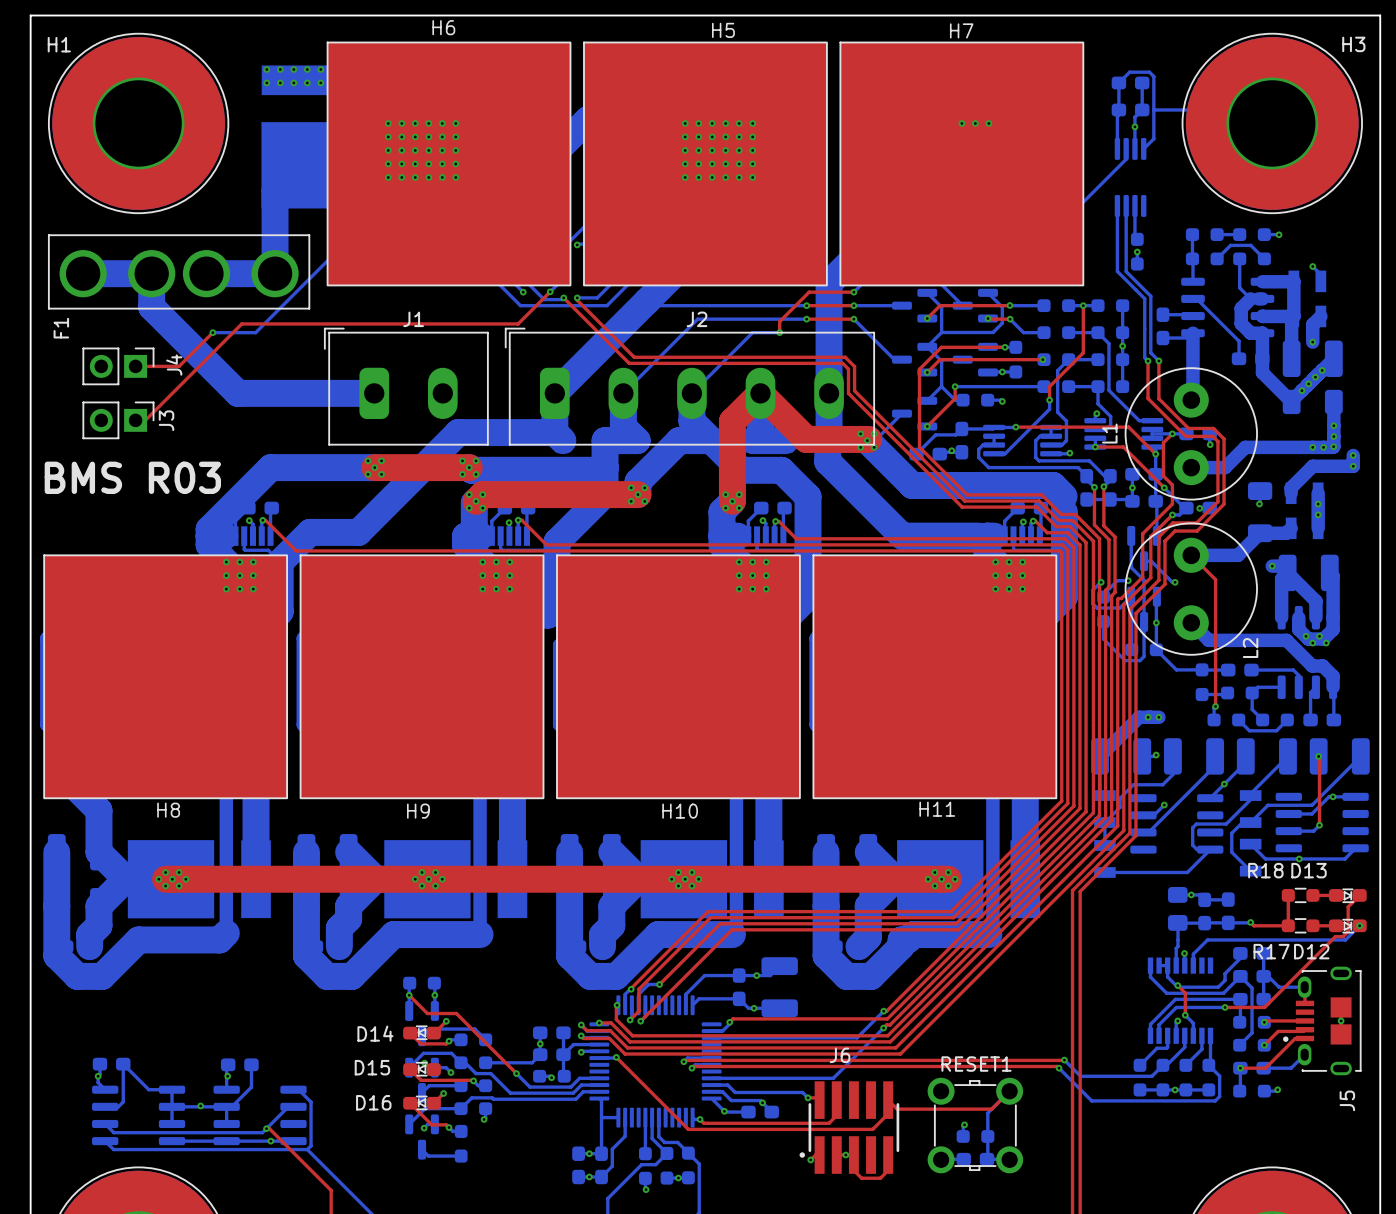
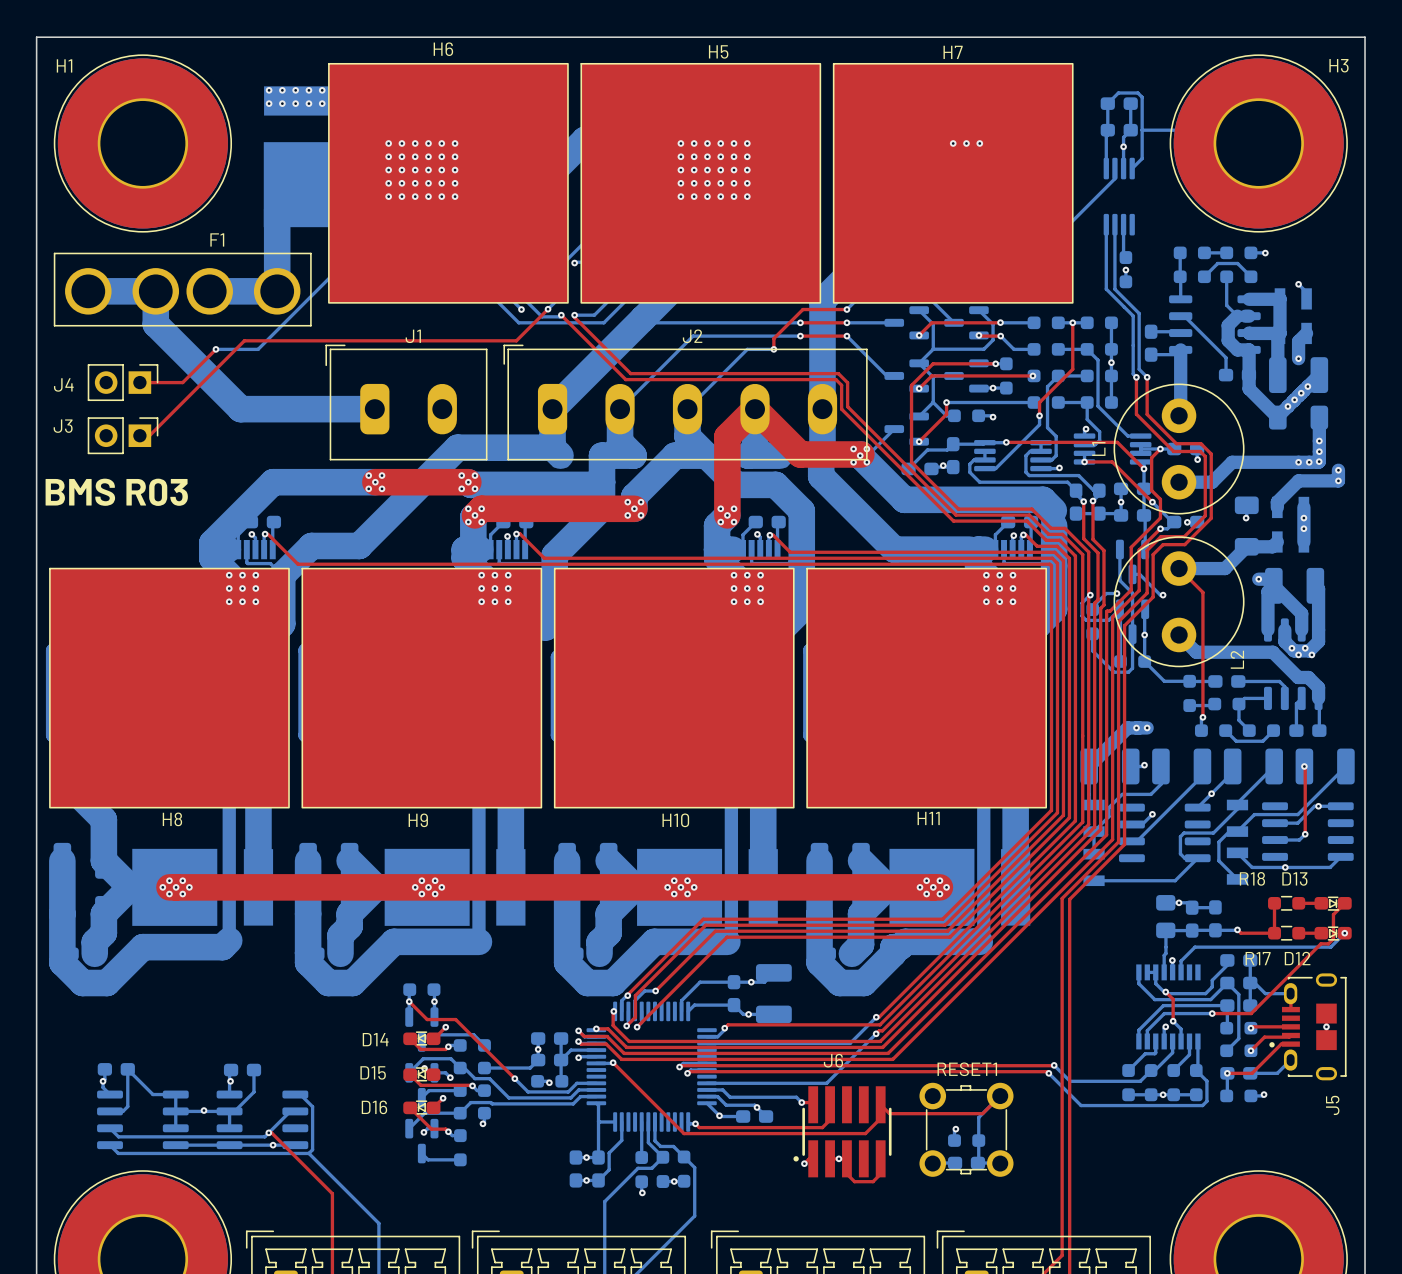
F1 name rotation: 0° (61, 328) -> 90° clockwise (217, 239)
F1 name position: F1 (61, 328) -> F1 (217, 239)
J4 name rotation: 0° (174, 365) -> 90° clockwise (63, 384)
J4 name position: J4 (174, 365) -> J4 (63, 384)
J3 name rotation: 0° (166, 420) -> 90° clockwise (63, 426)
J3 name position: J3 (166, 420) -> J3 (63, 426)

